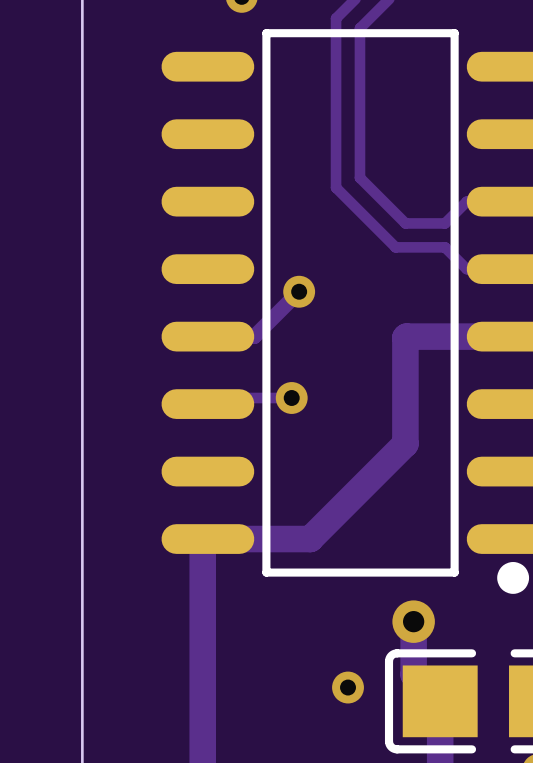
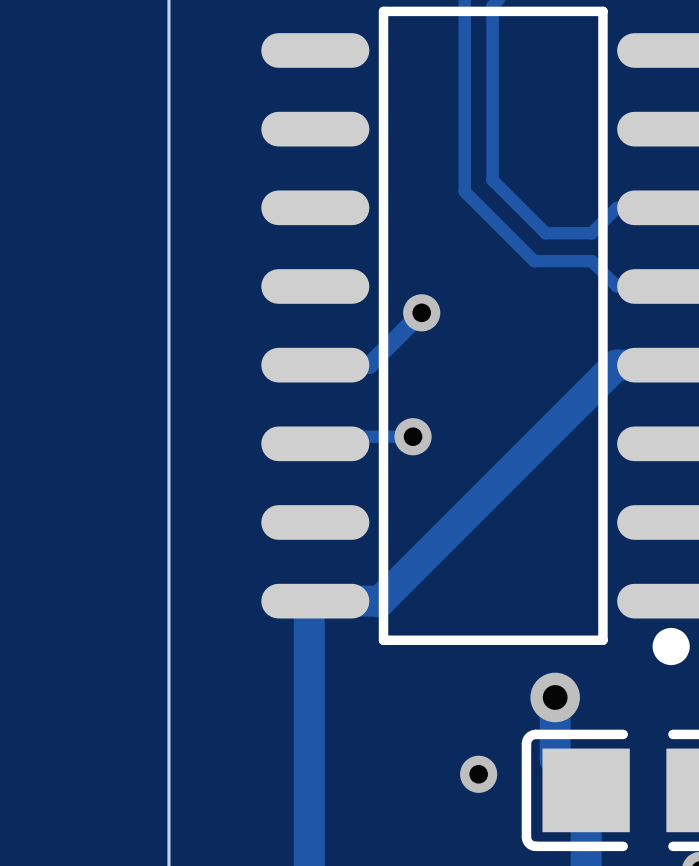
track: (466, 336) (406, 336) (405, 443) (310, 539) (262, 539) -> (616, 365) (379, 601)

